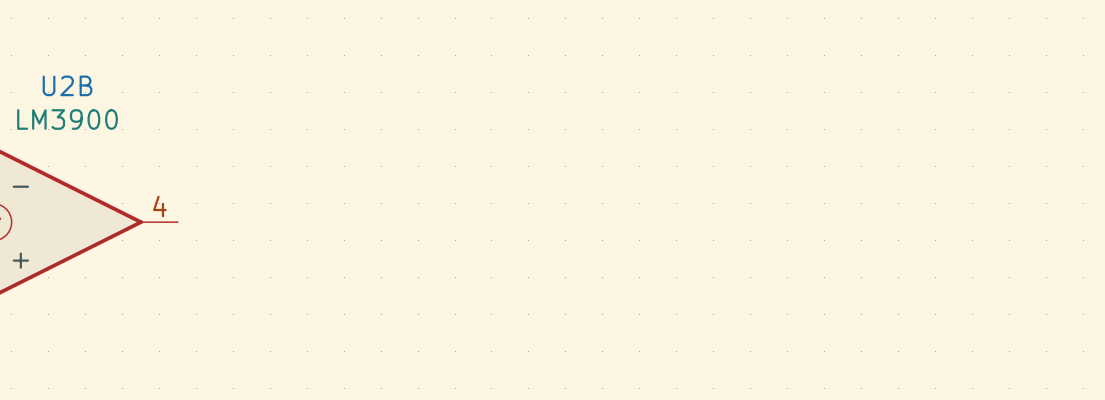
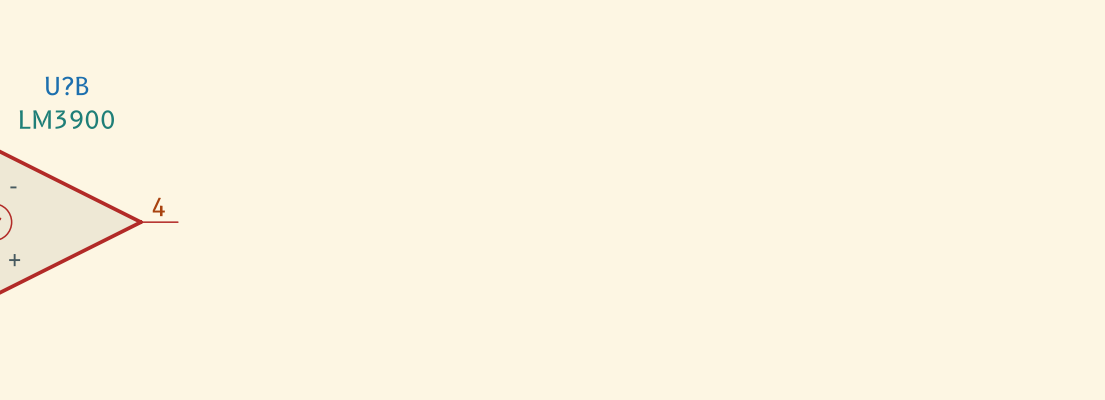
U2B name: U2B (67, 85) -> U?B (67, 85)

